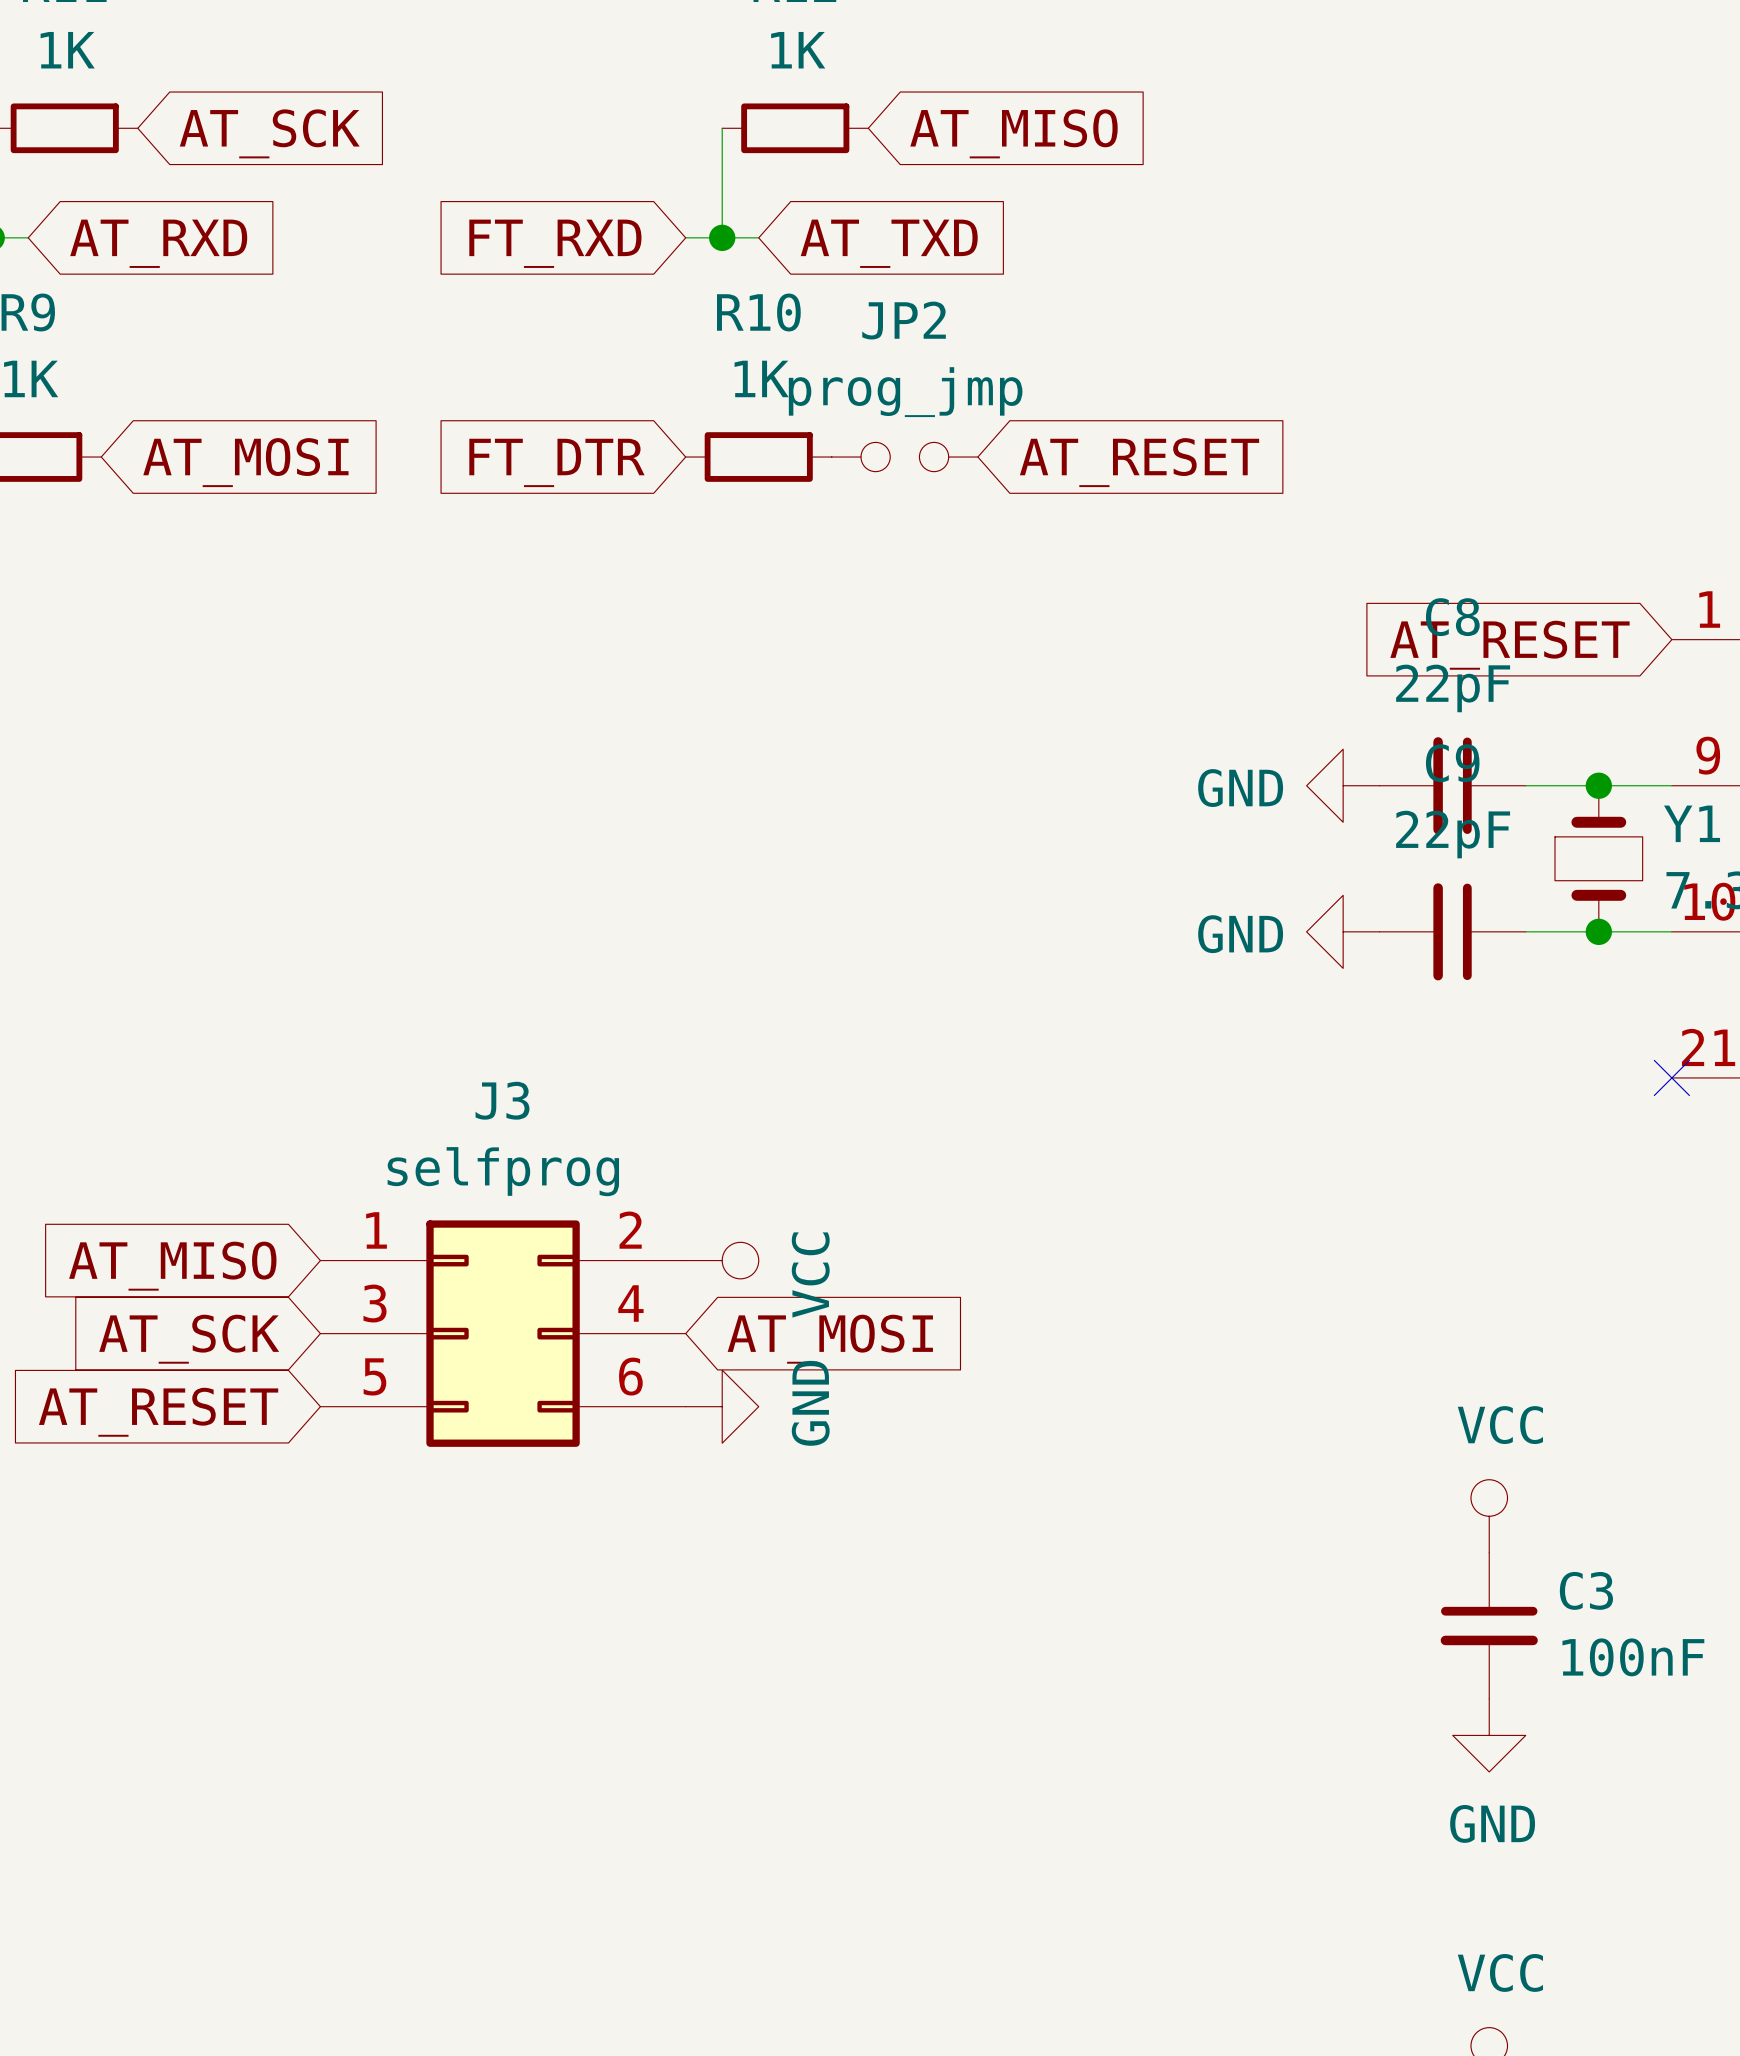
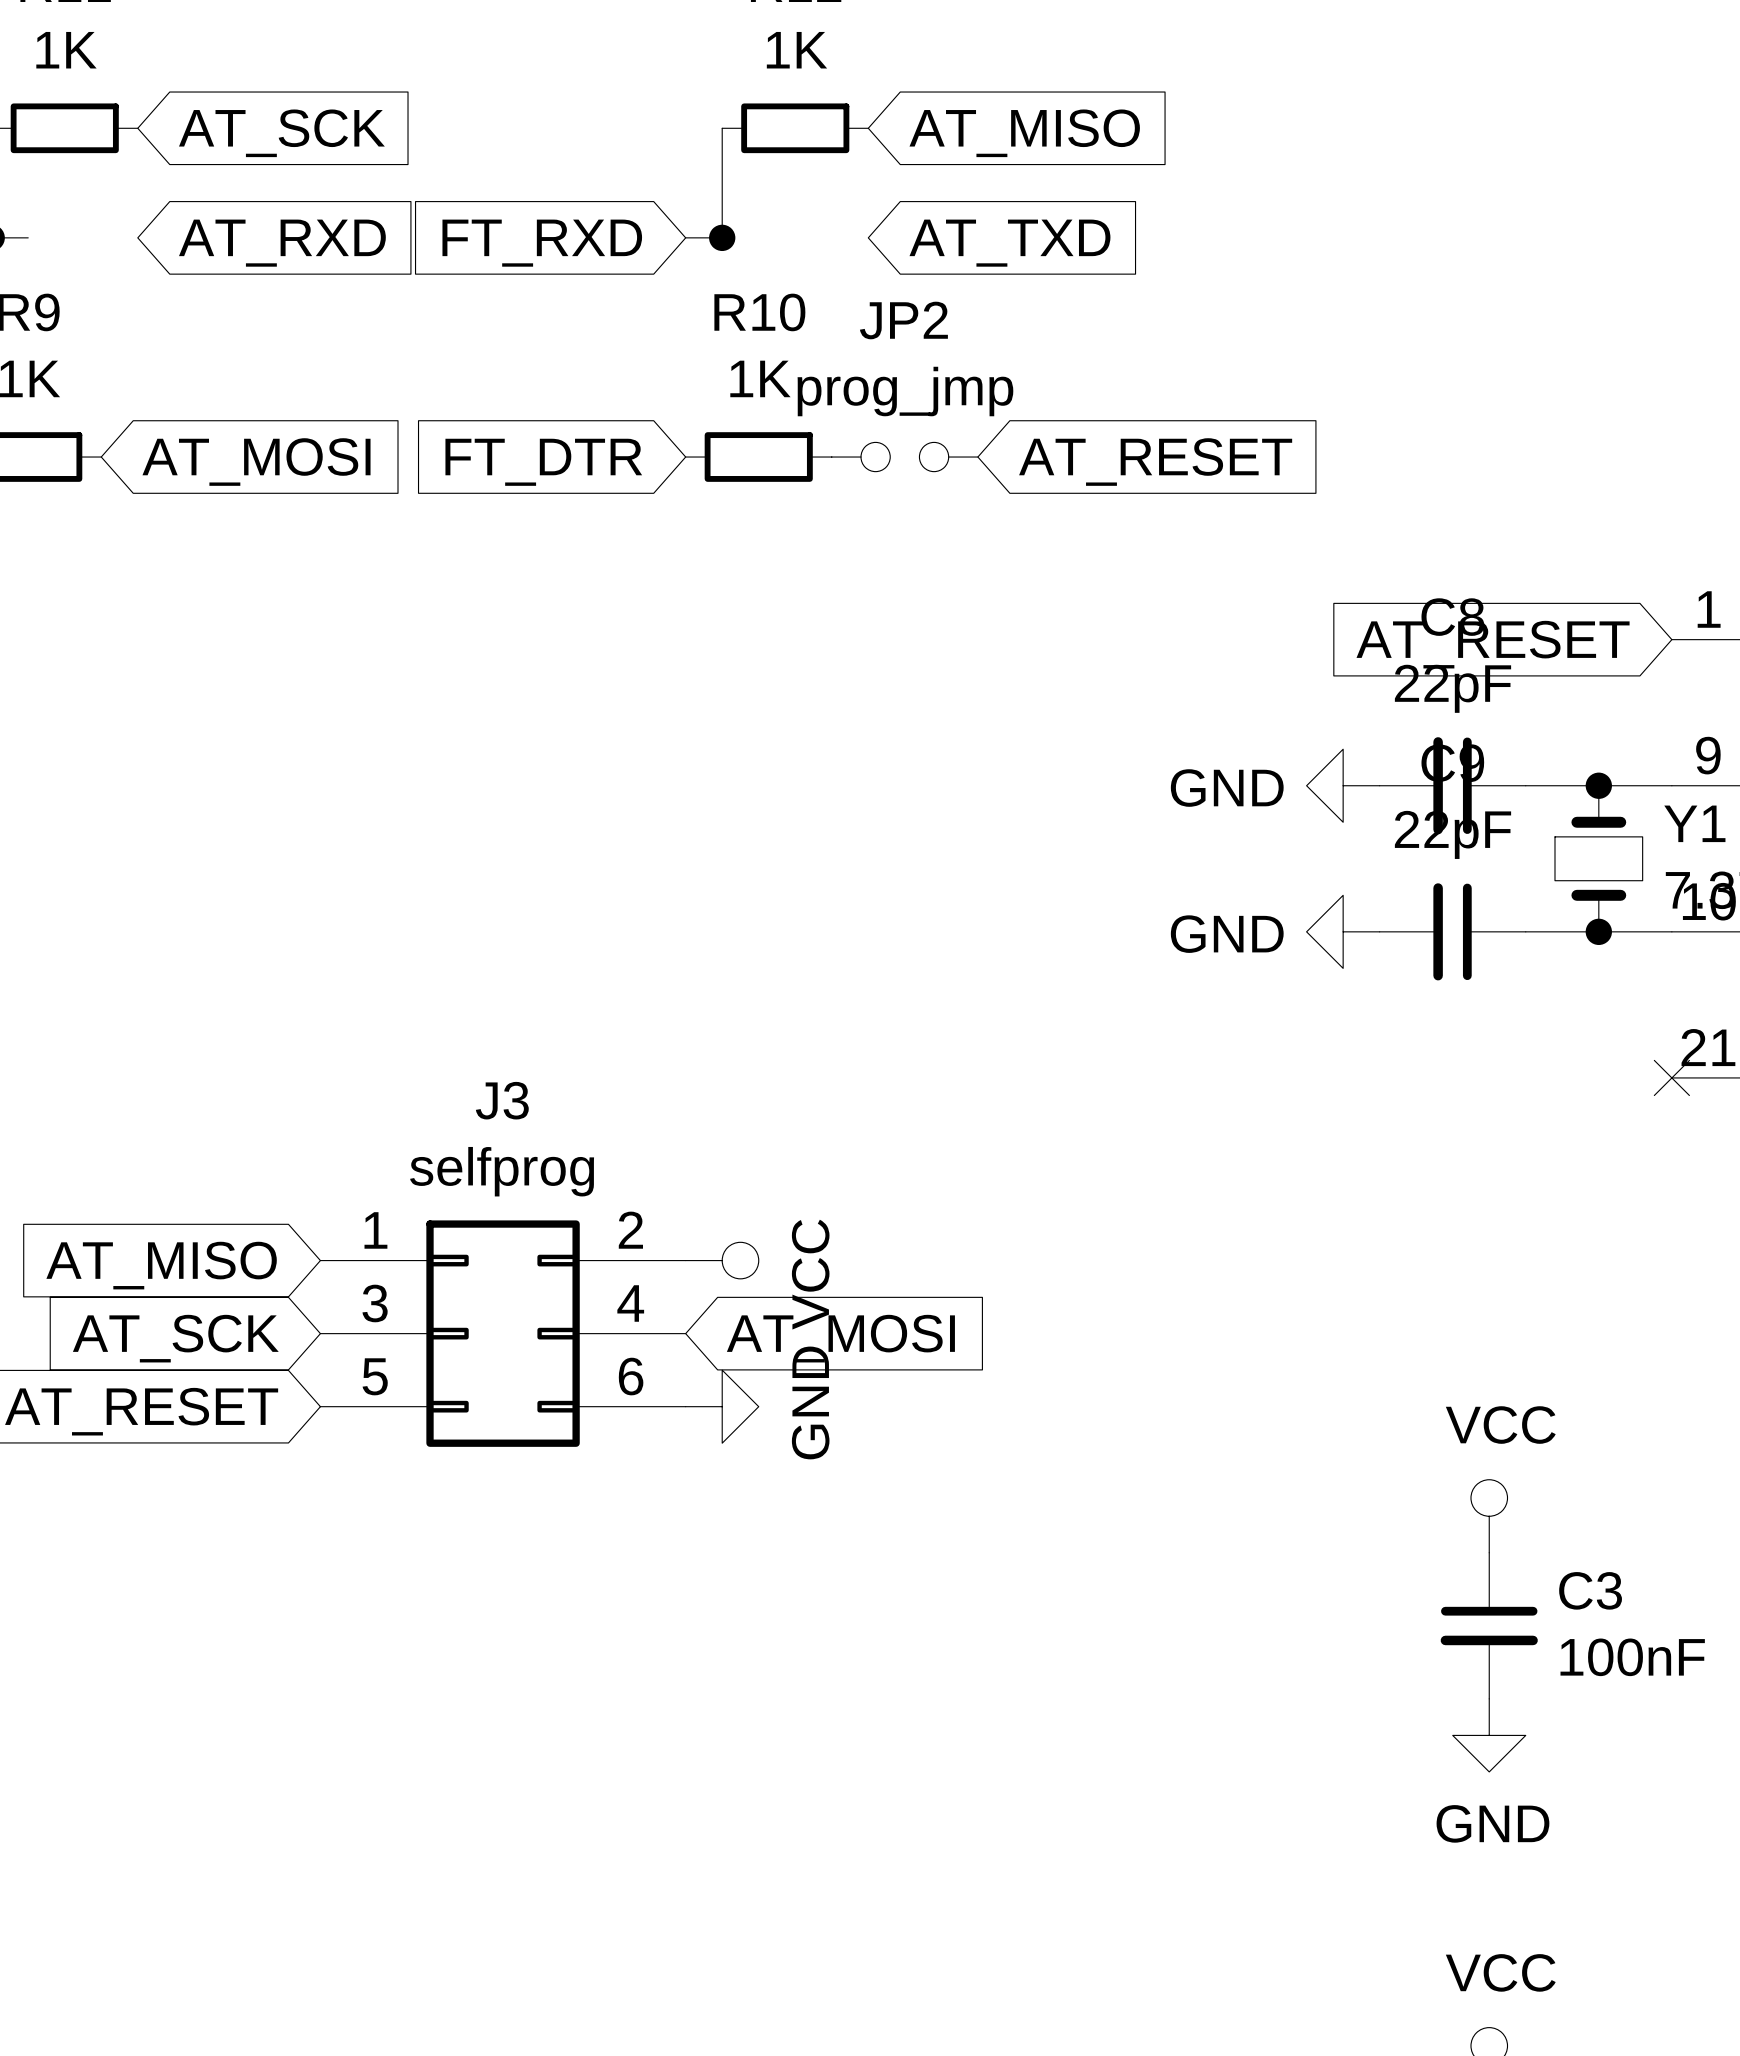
wire: (722, 237) (758, 237) -> none
global label position: AT_RXD (158, 243) -> AT_RXD (282, 243)
global label position: AT_TXD (889, 243) -> AT_TXD (1009, 243)

